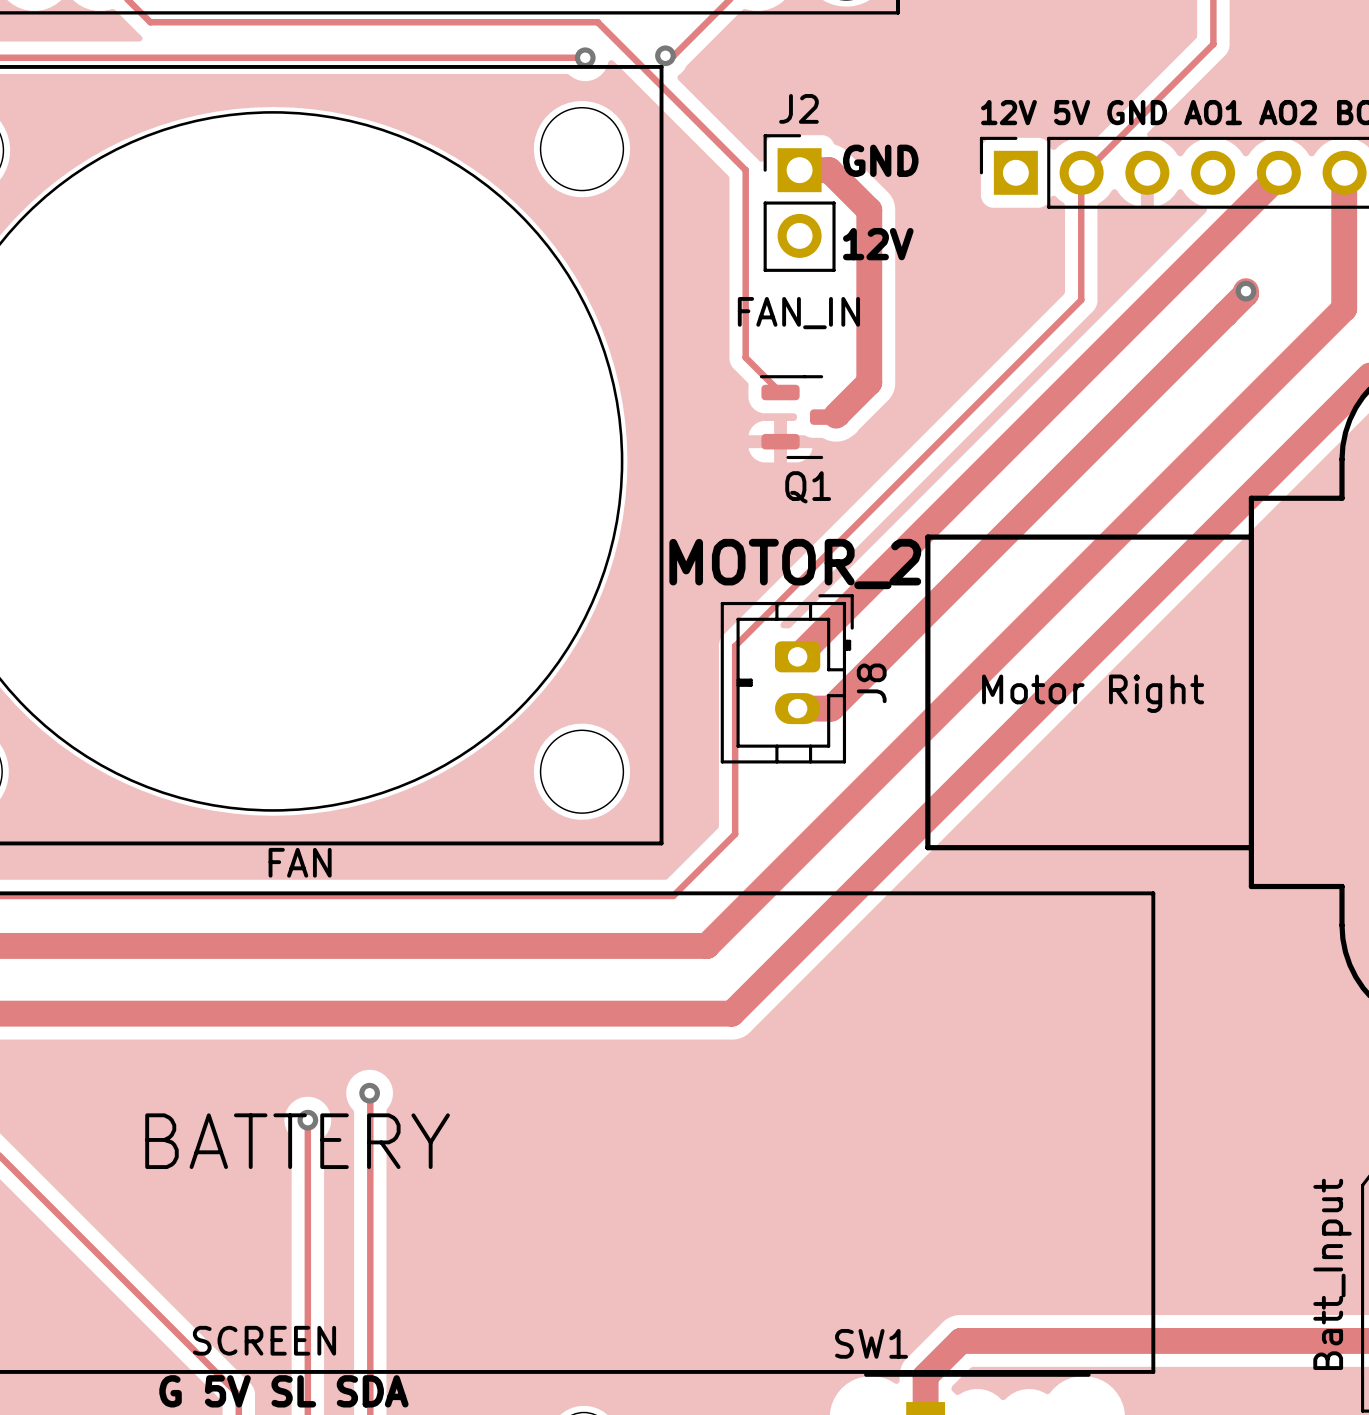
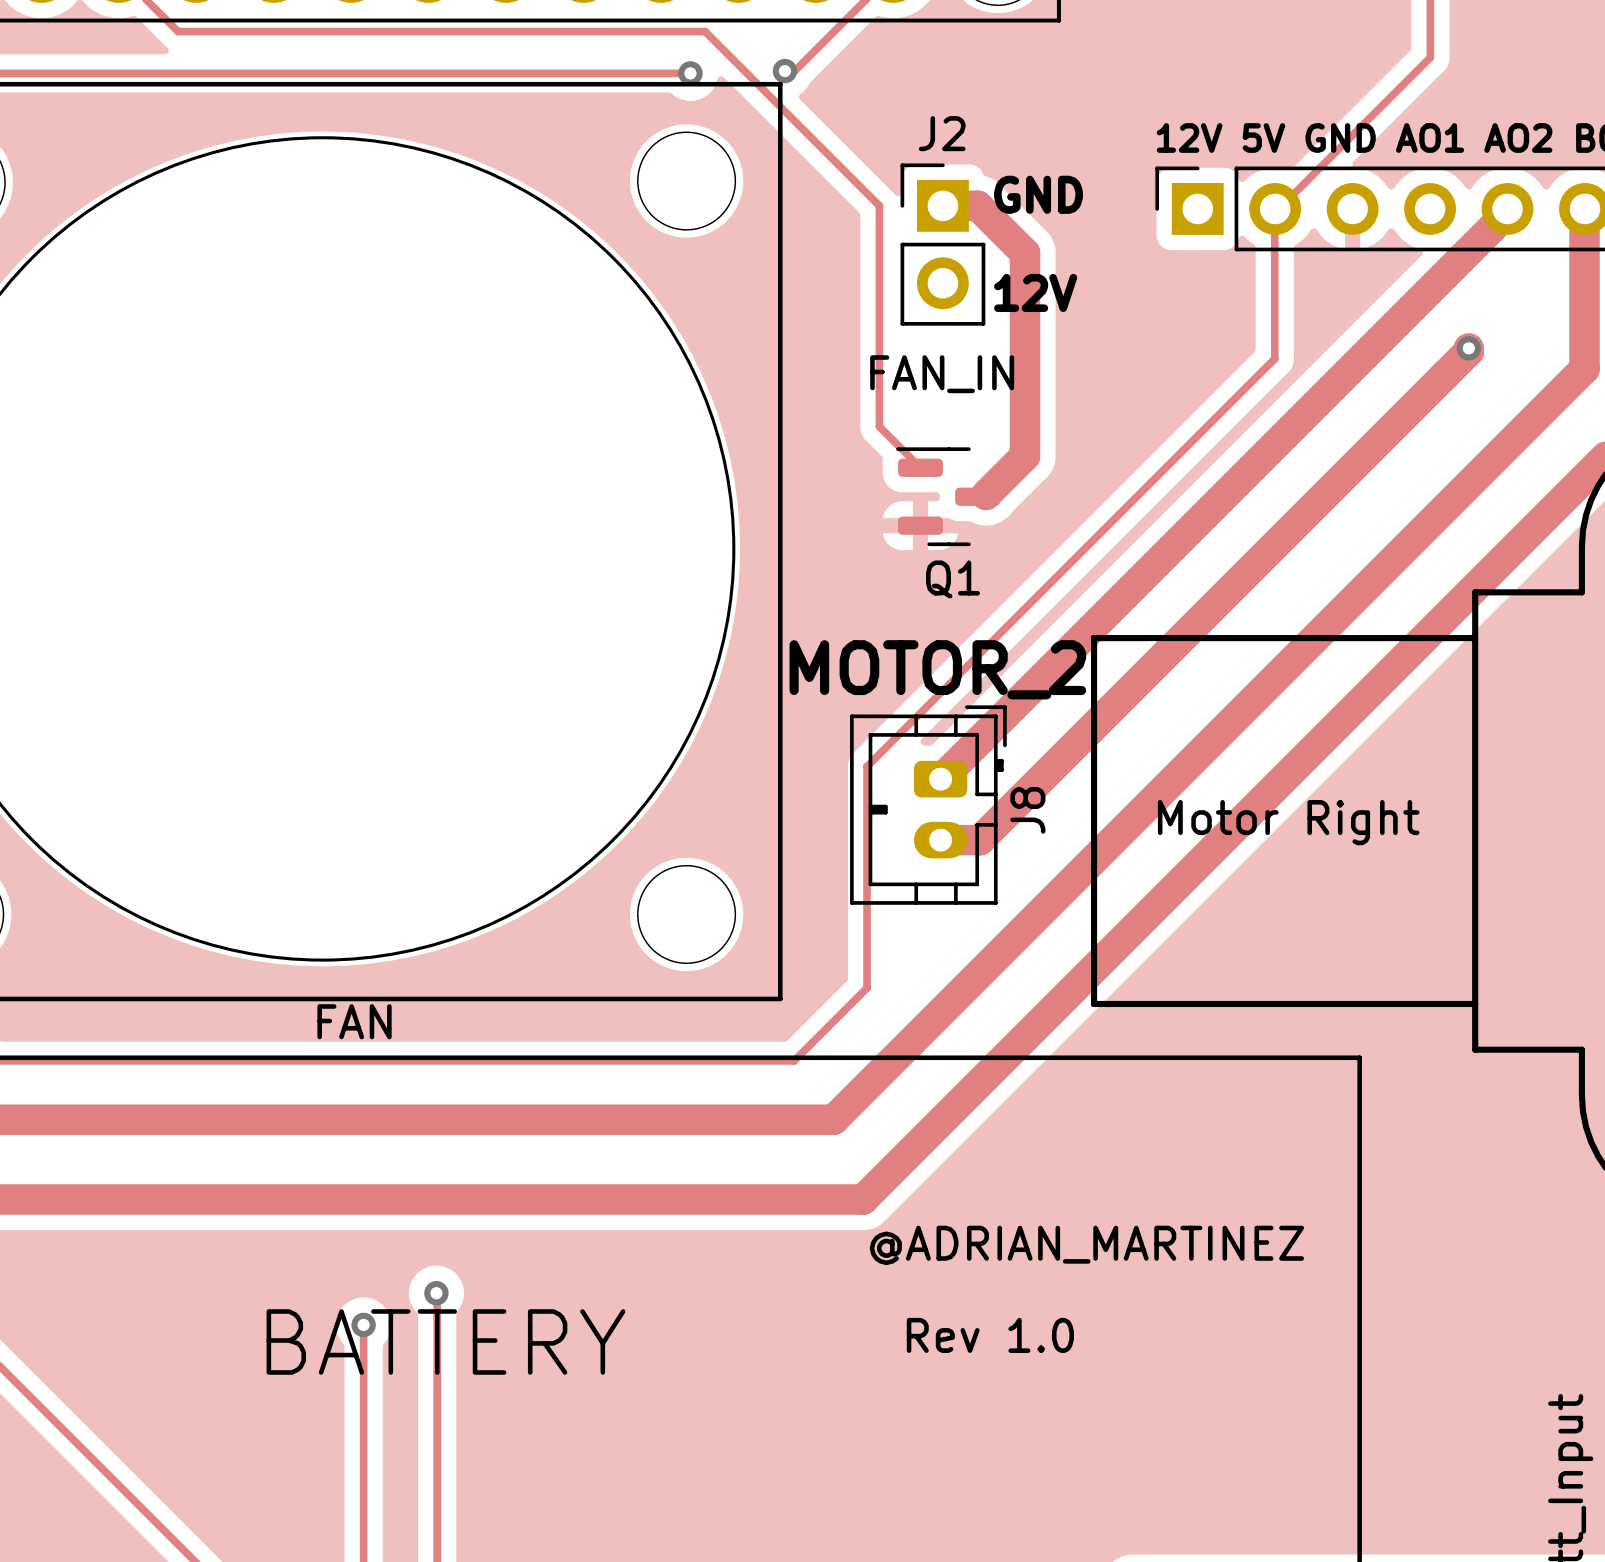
text: none -> @ADRIAN_MARTINEZ (1086, 1245)
text: none -> Rev 1.0 (990, 1335)
text position: BATTERY (297, 1141) -> BATTERY (445, 1341)

